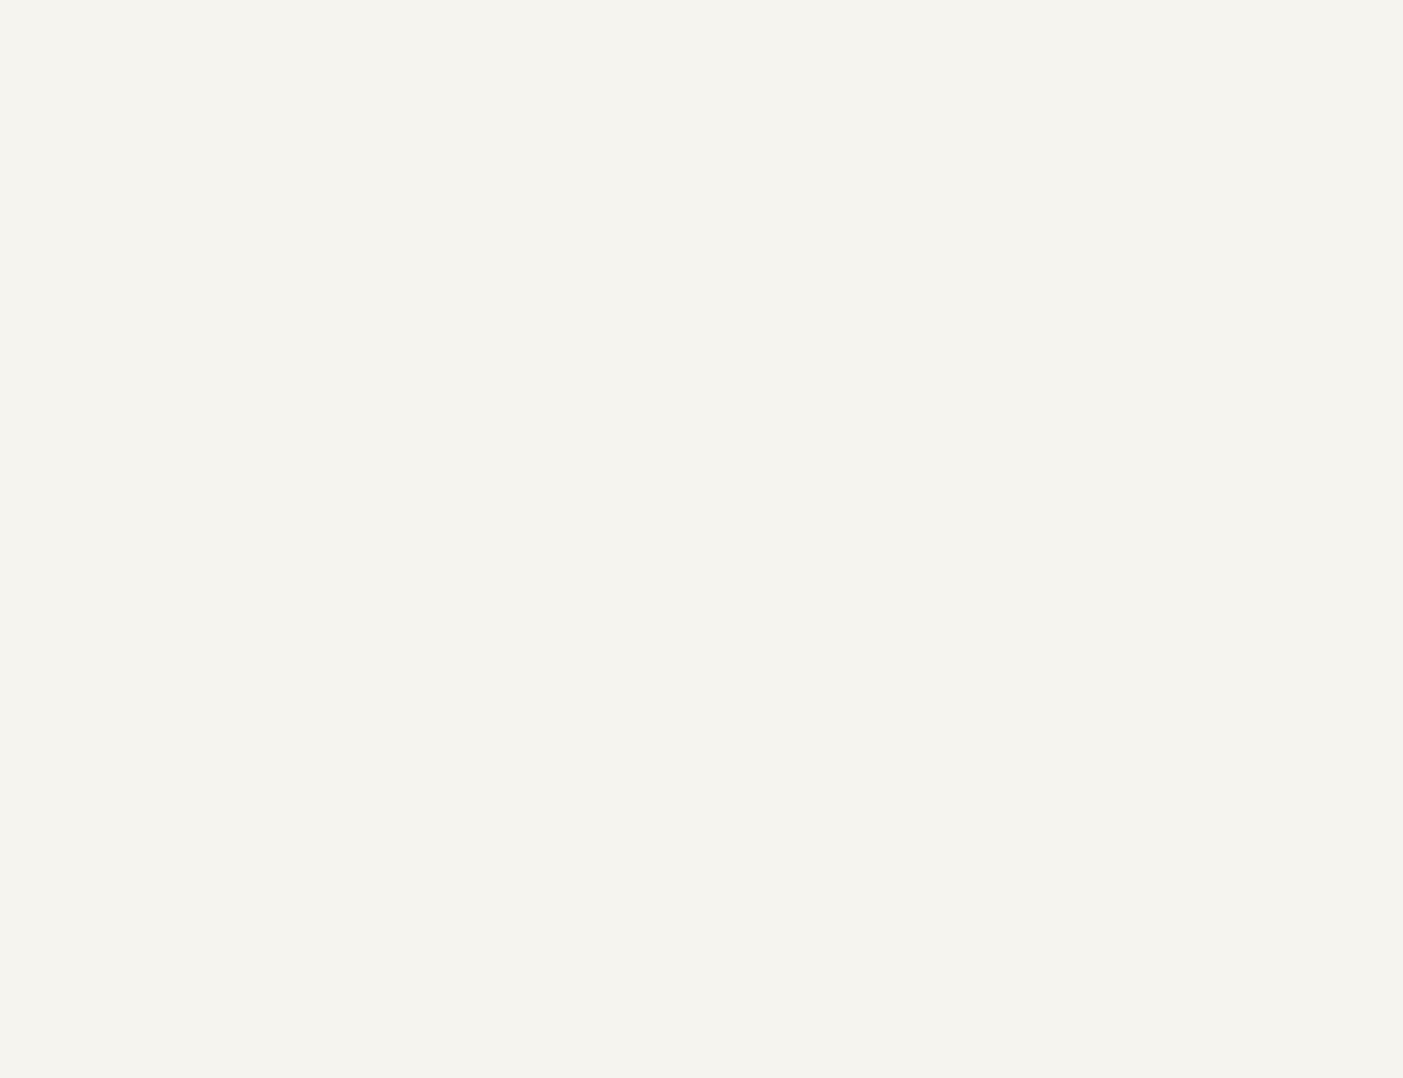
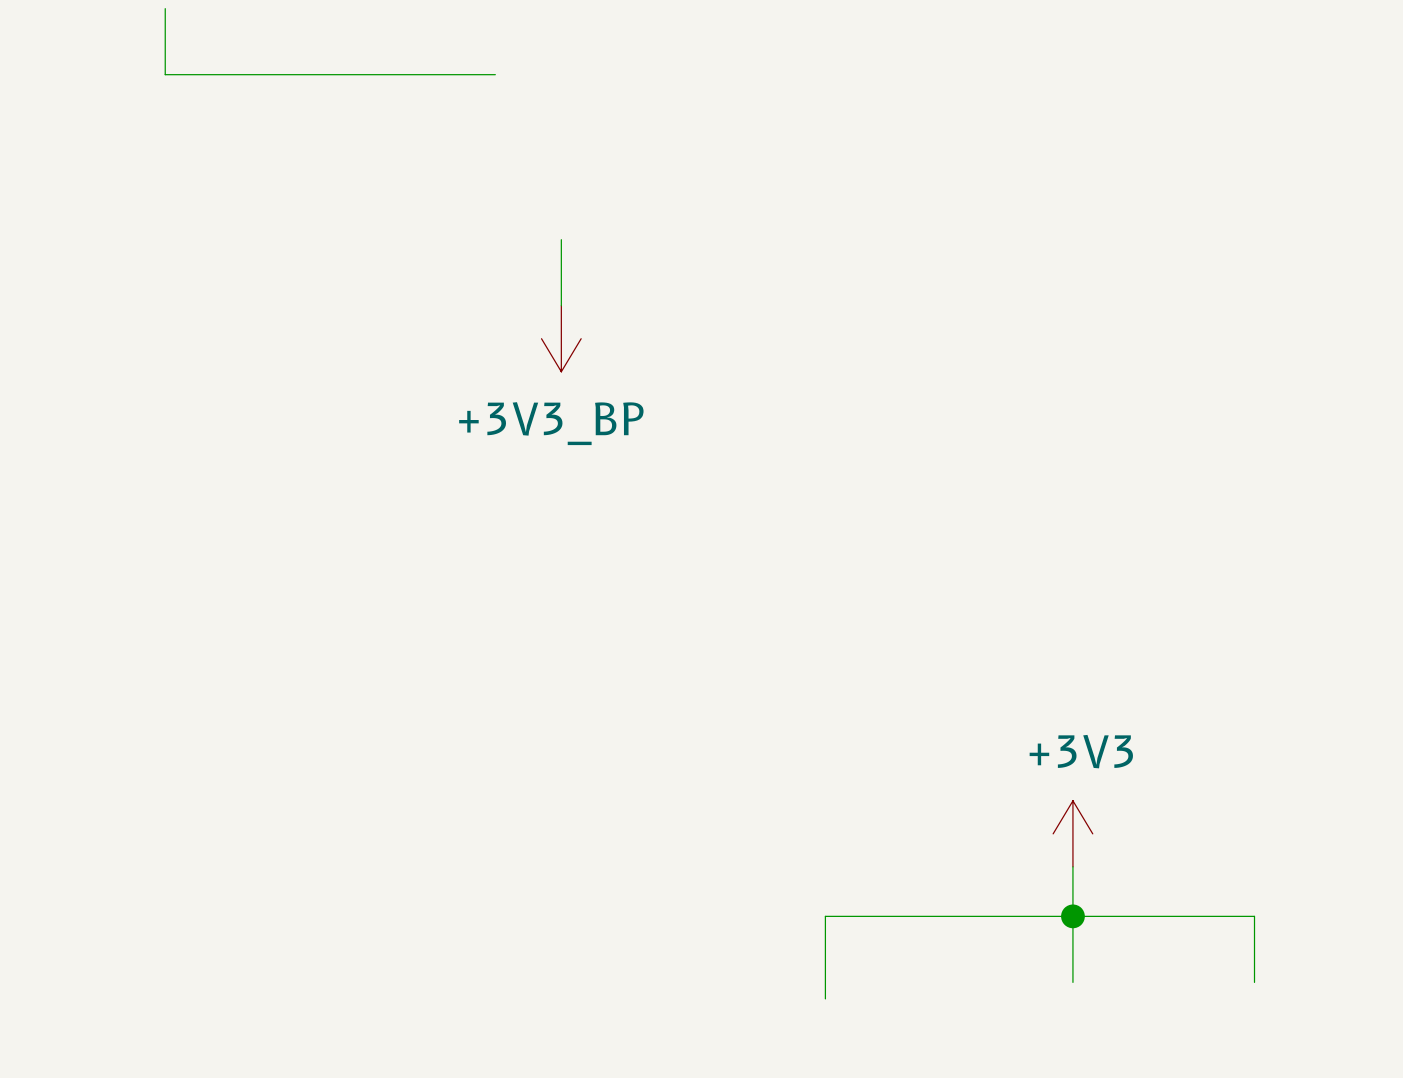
wire: none -> (165, 8) (165, 74) (495, 74)
wire: none -> (561, 239) (561, 305)
power symbol: none -> +3V3_BP (561, 338)
power symbol: none -> +3V3 (1072, 833)
wire: none -> (1072, 866) (1072, 982)
junction: none -> (1072, 916)
wire: none -> (1254, 982) (1254, 916) (825, 916) (825, 998)

